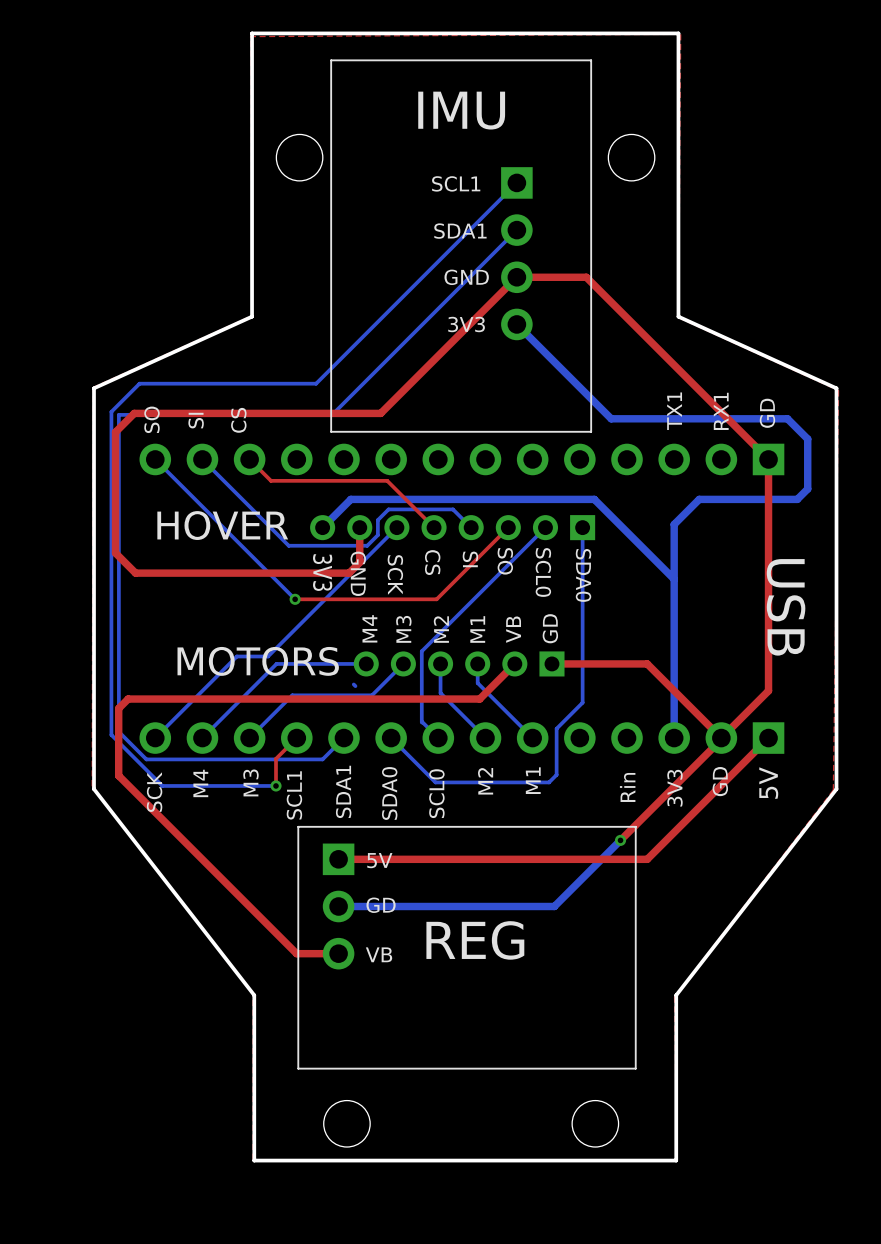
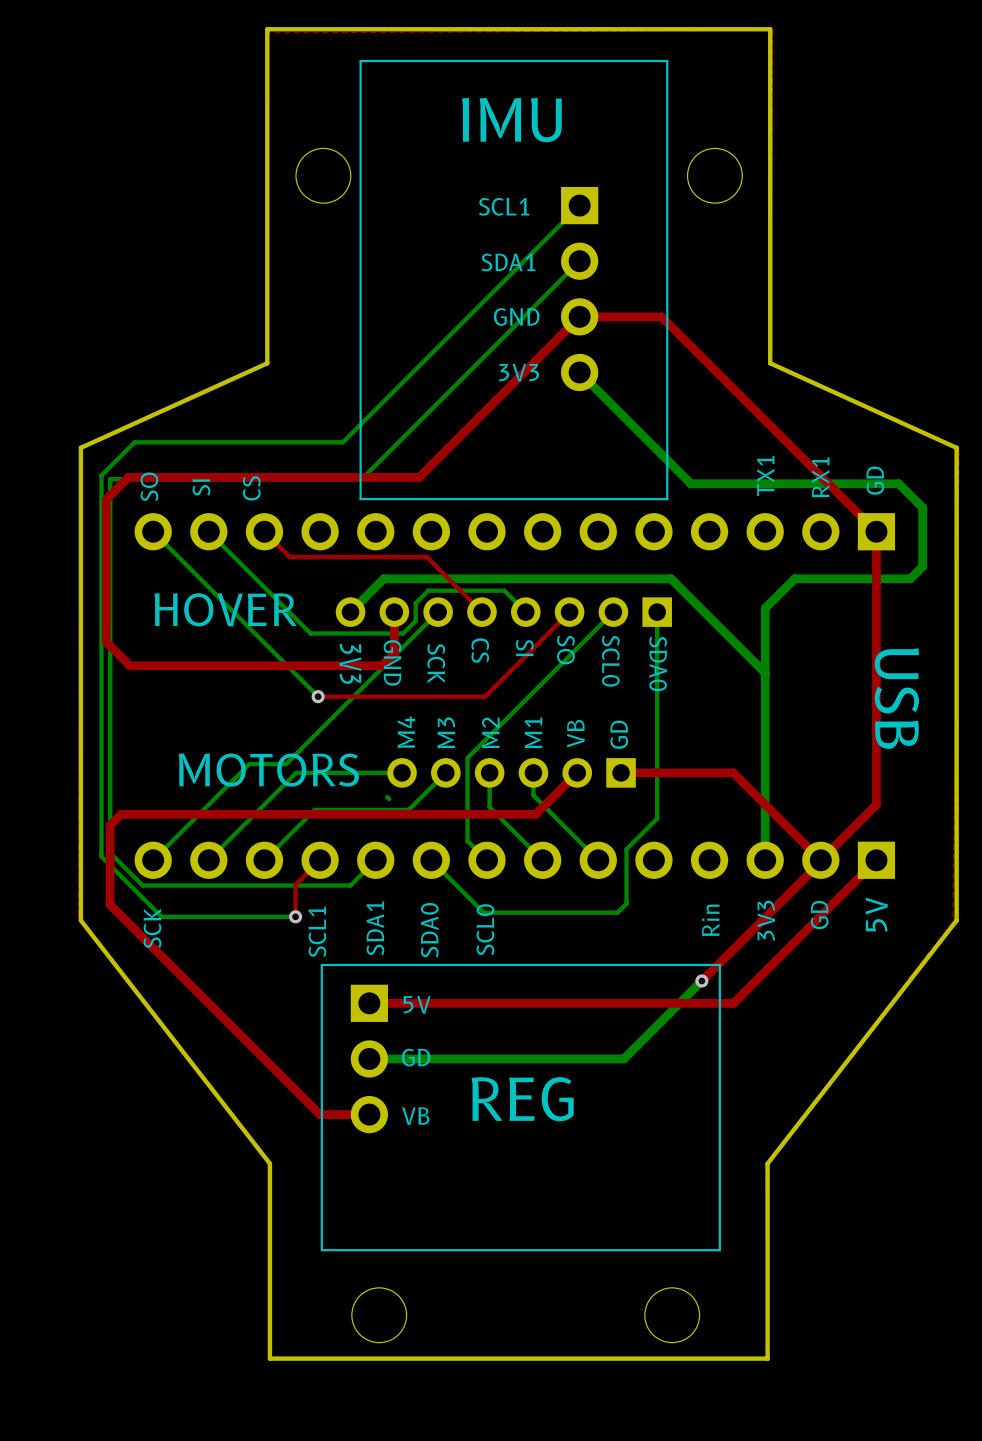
text: M1 (533, 780) -> none
text: M2 (485, 781) -> none
text: M3 (250, 782) -> none
text: M4 (200, 783) -> none

